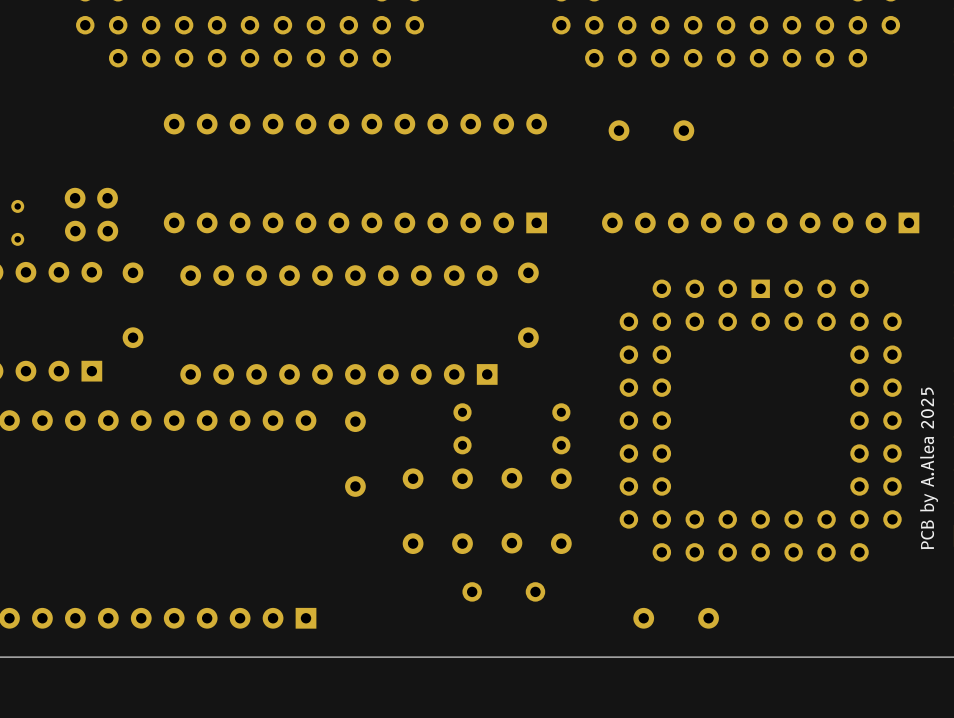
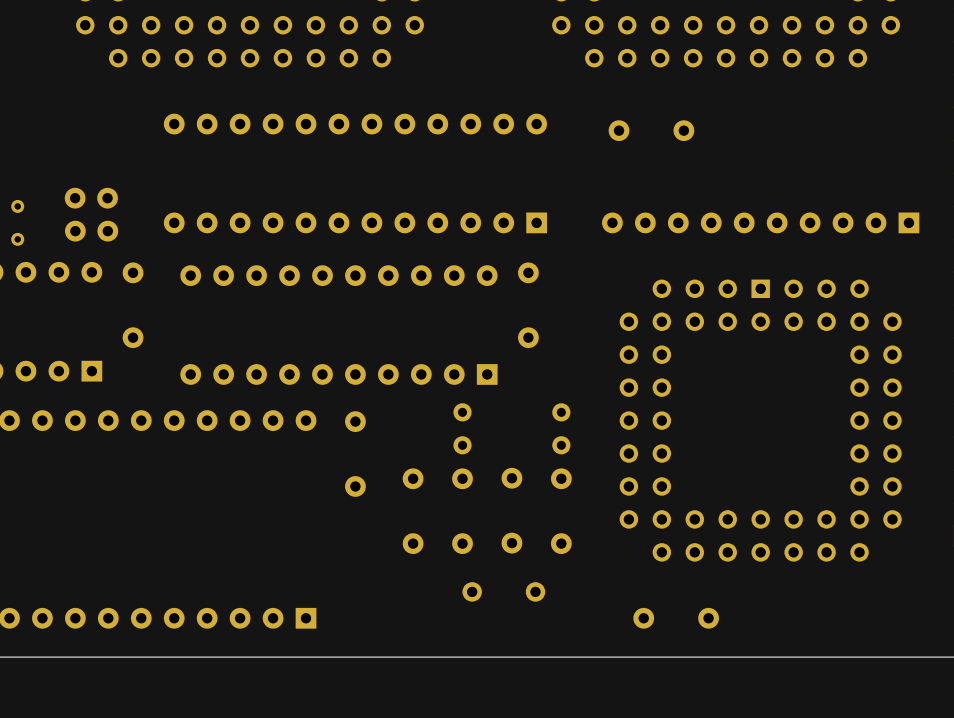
text: PCB by A.Alea 2025 (929, 468) -> none

